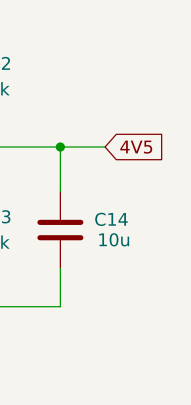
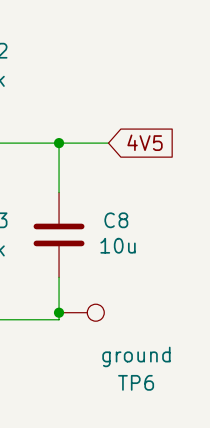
C14 name: C14 (111, 219) -> C8 (116, 220)
junction: none -> (59, 312)
TP6: none -> ground (81, 312)

